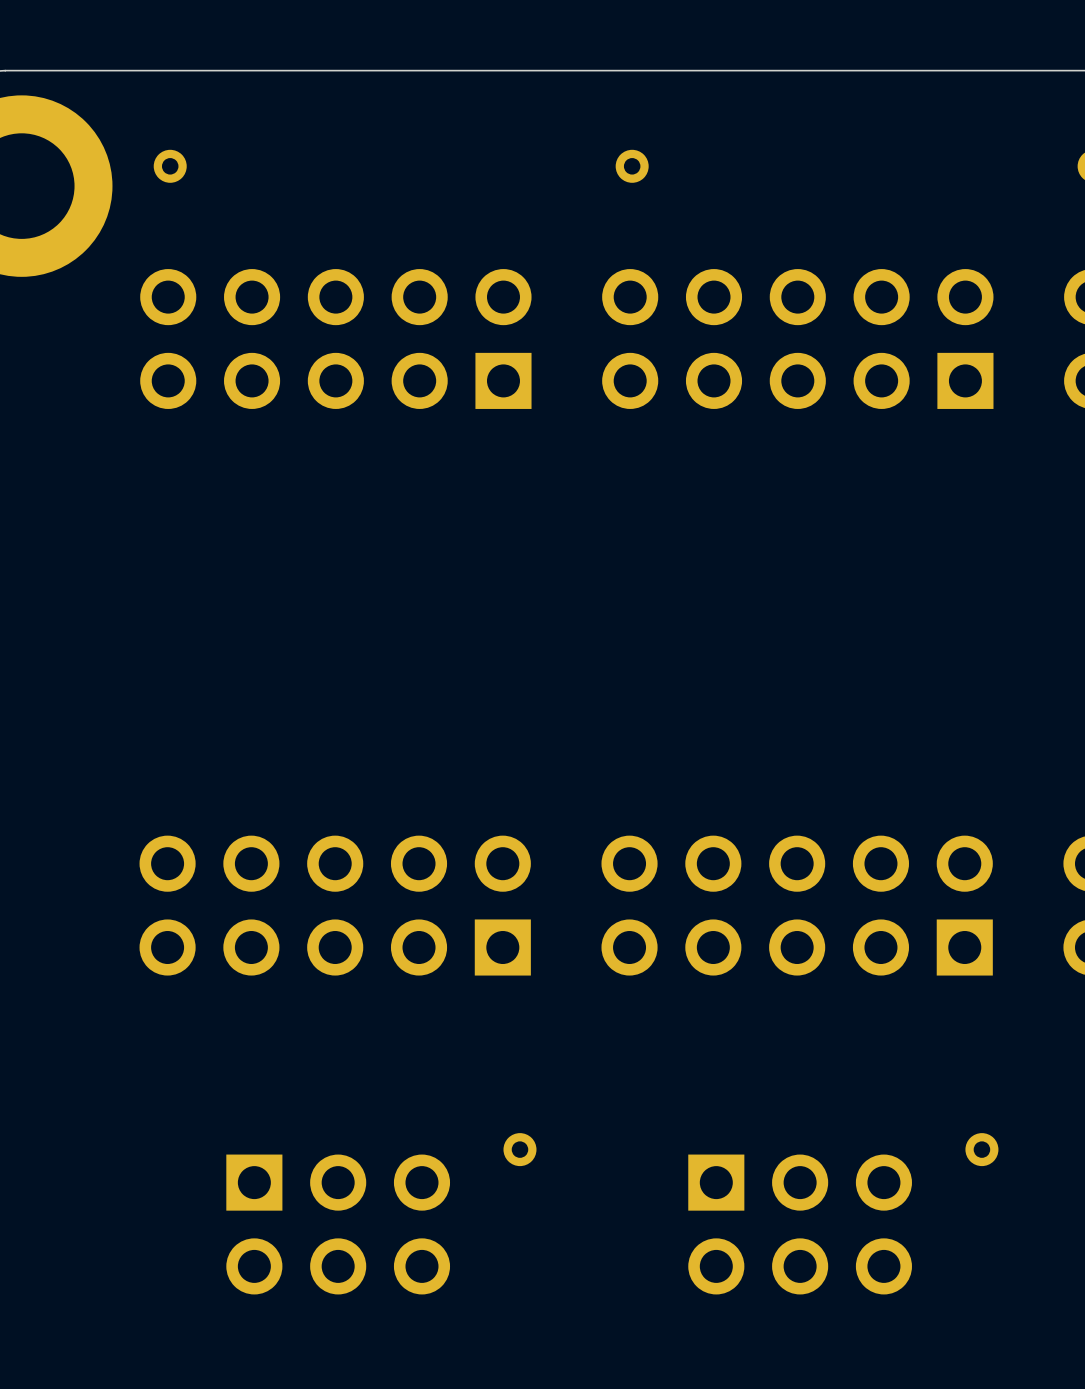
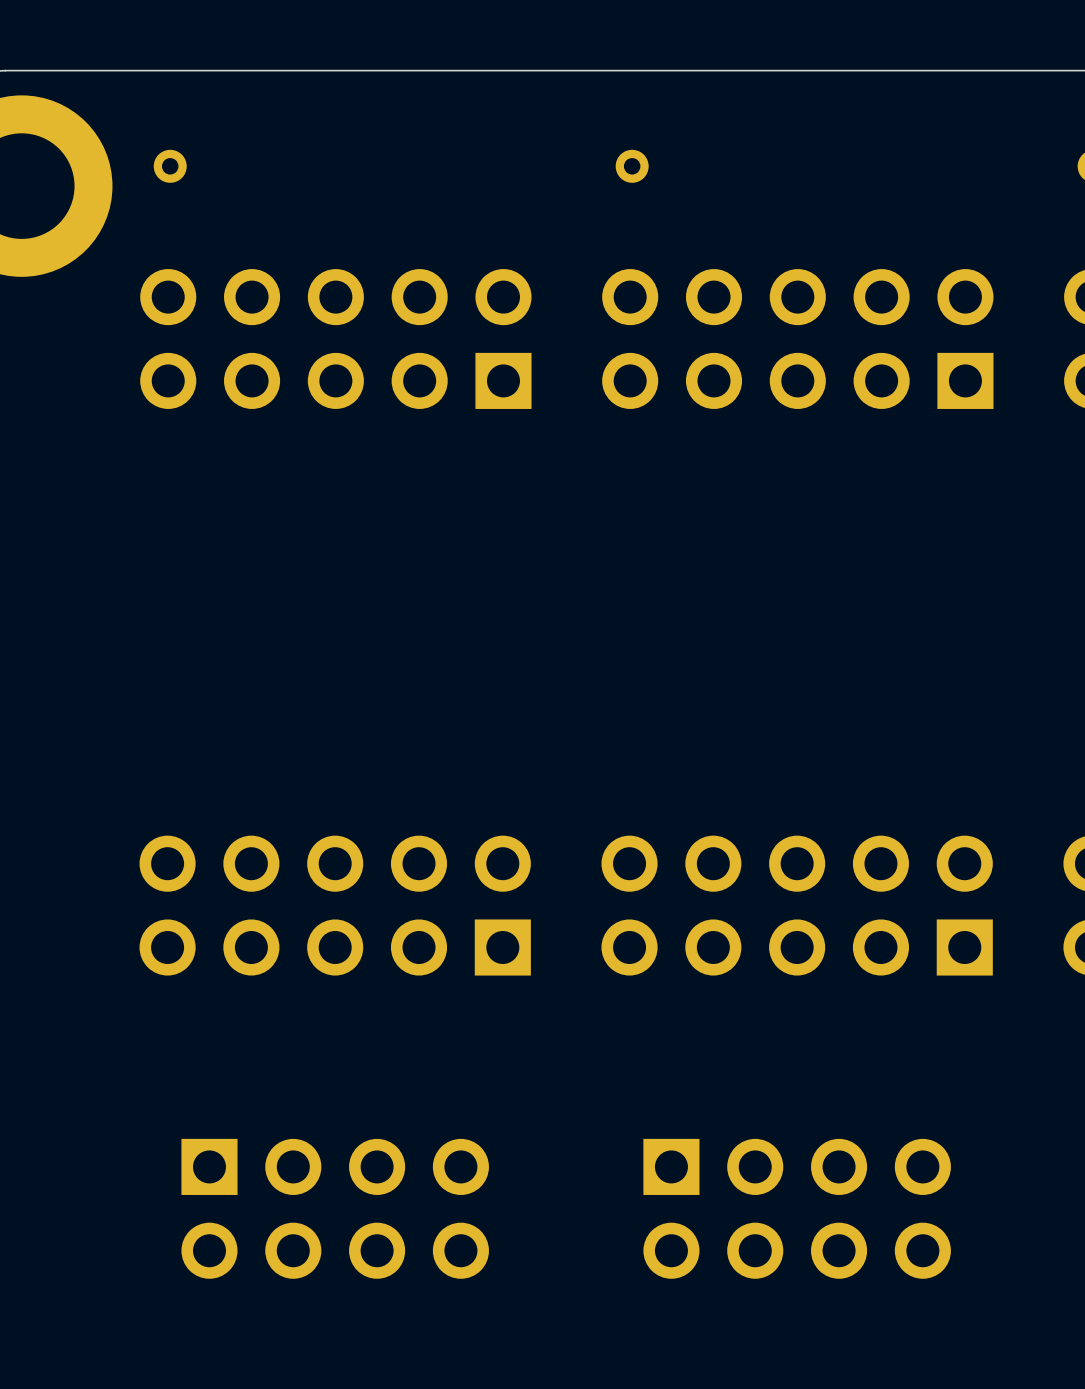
part: (519, 1149) -> none
part: (981, 1149) -> none
part footprint: [226, 1154, 451, 1295] -> [181, 1138, 489, 1279]
part footprint: [688, 1154, 912, 1295] -> [643, 1138, 951, 1279]

